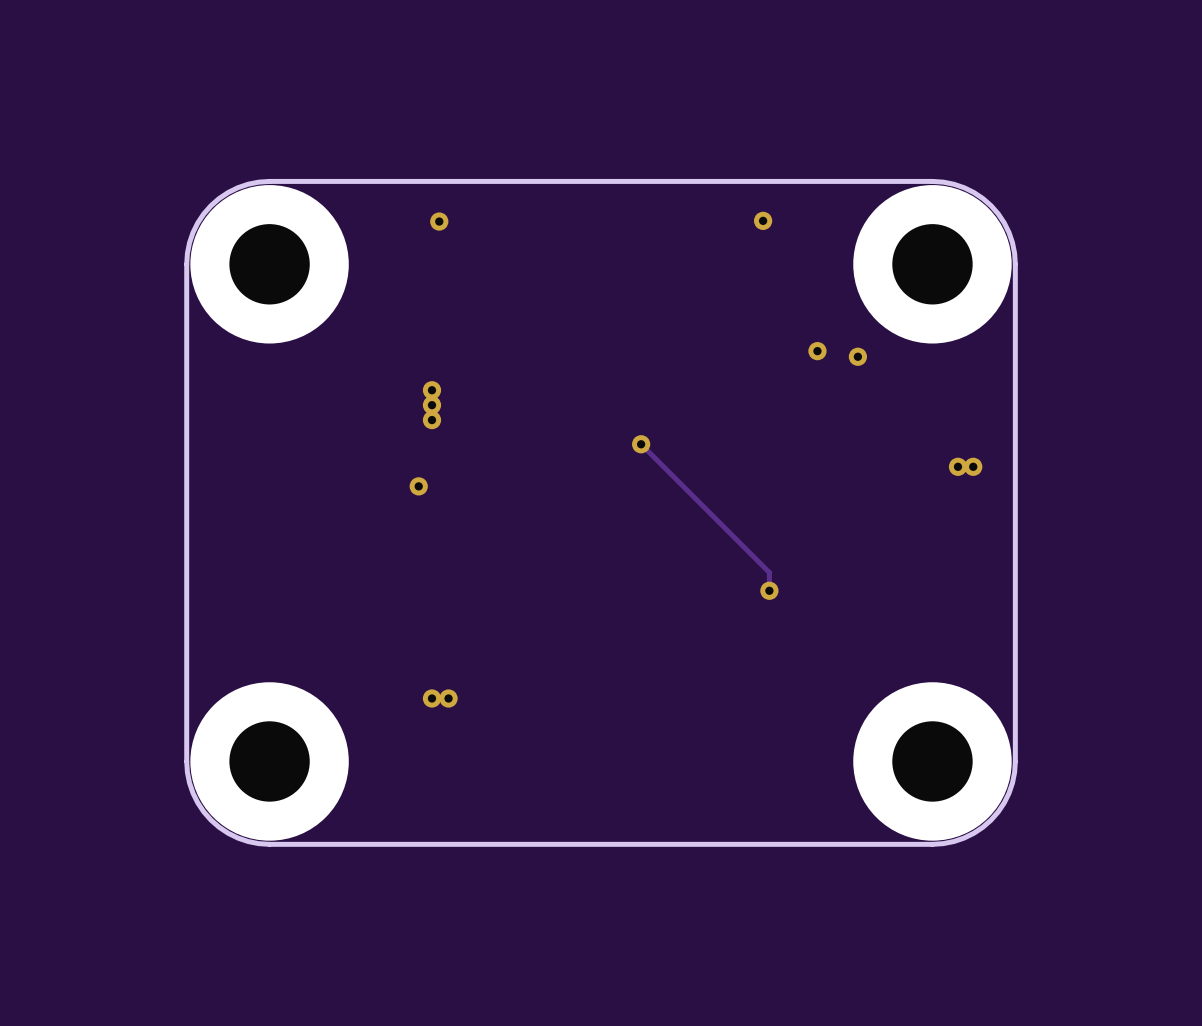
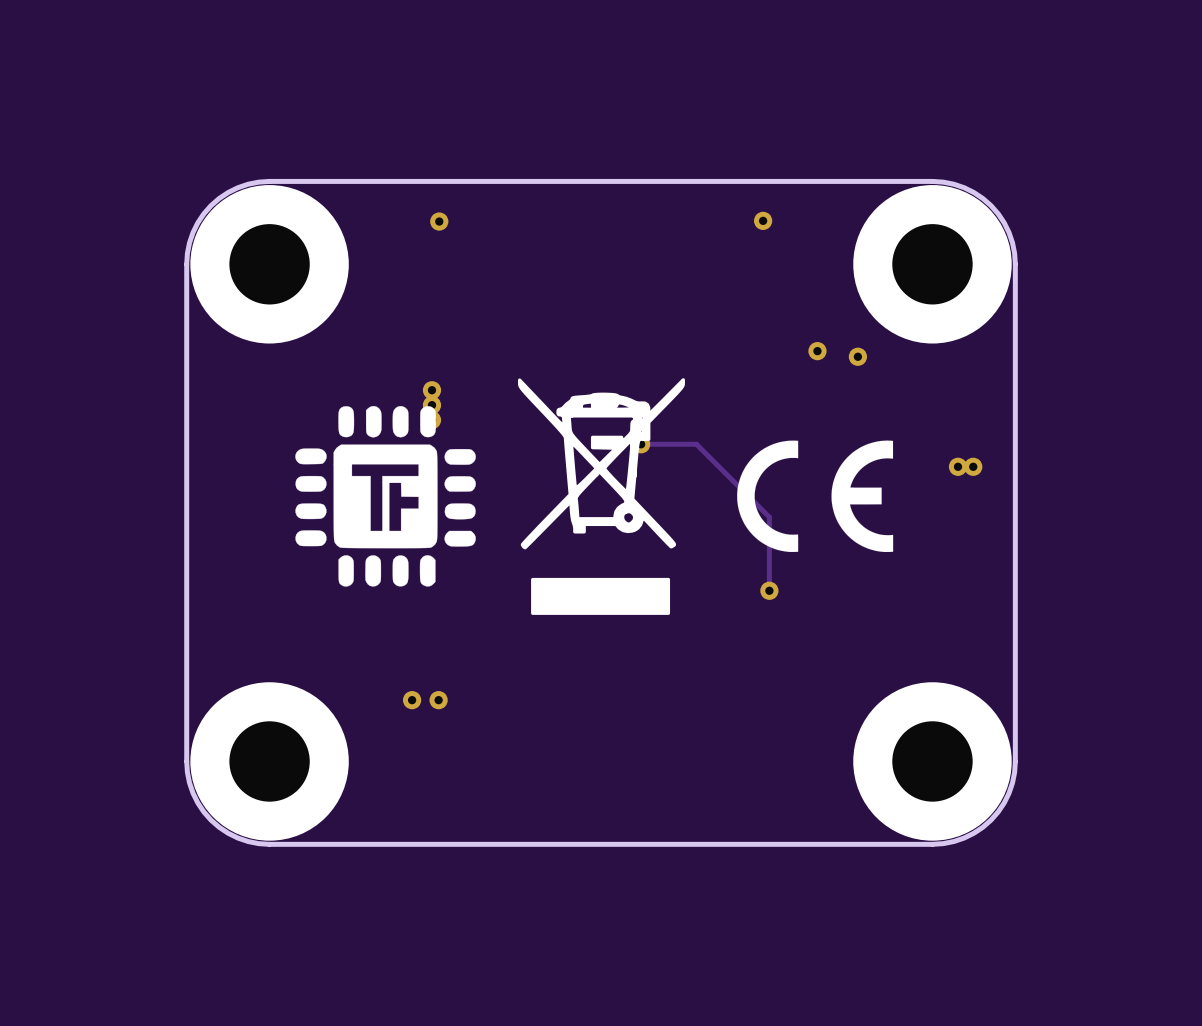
drawing: none -> [517, 378, 685, 615]
drawing: none -> [295, 406, 476, 587]
drawing: none -> [737, 440, 894, 553]
track: (641, 444) (769, 572) -> (641, 444) (696, 444) (769, 517) (769, 572)
via: (431, 698) -> none
via: (448, 698) -> none
via: none -> (412, 700)
via: none -> (438, 700)

